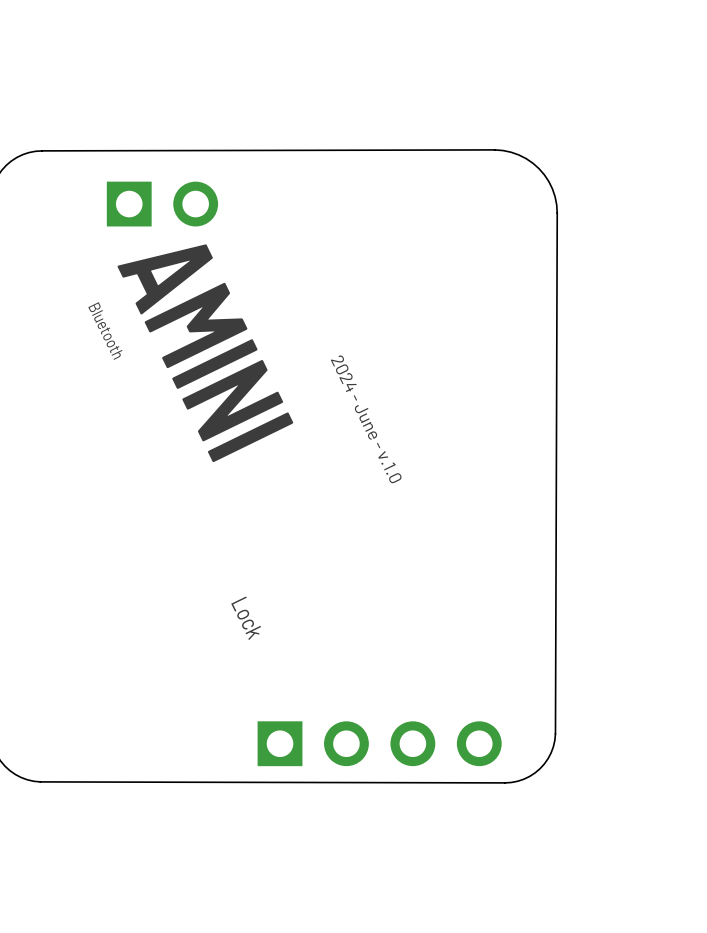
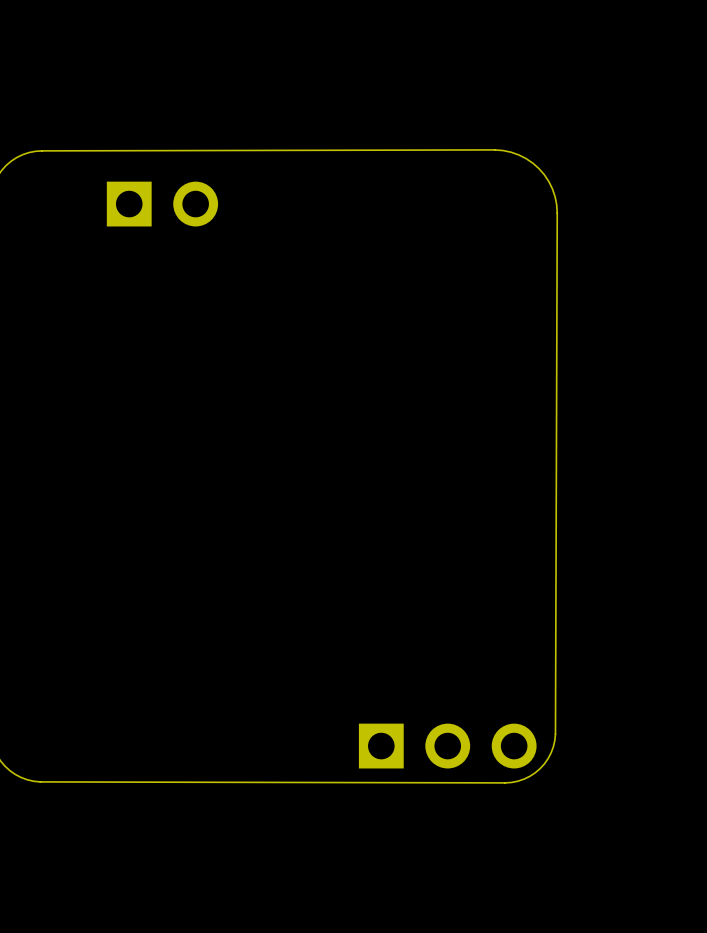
text: Bluetooth (105, 331) -> none
text: AMINI (205, 353) -> none
text: 2024 - June - v.1.0 (366, 419) -> none
text: Lock (246, 618) -> none
part: (379, 743) -> none
part: none -> (447, 746)

